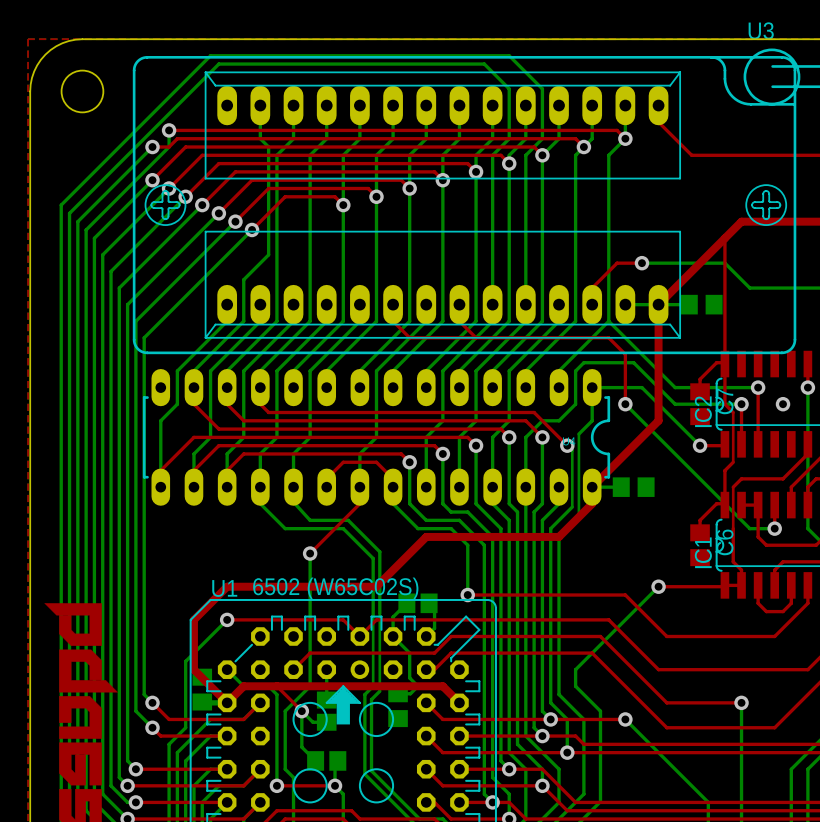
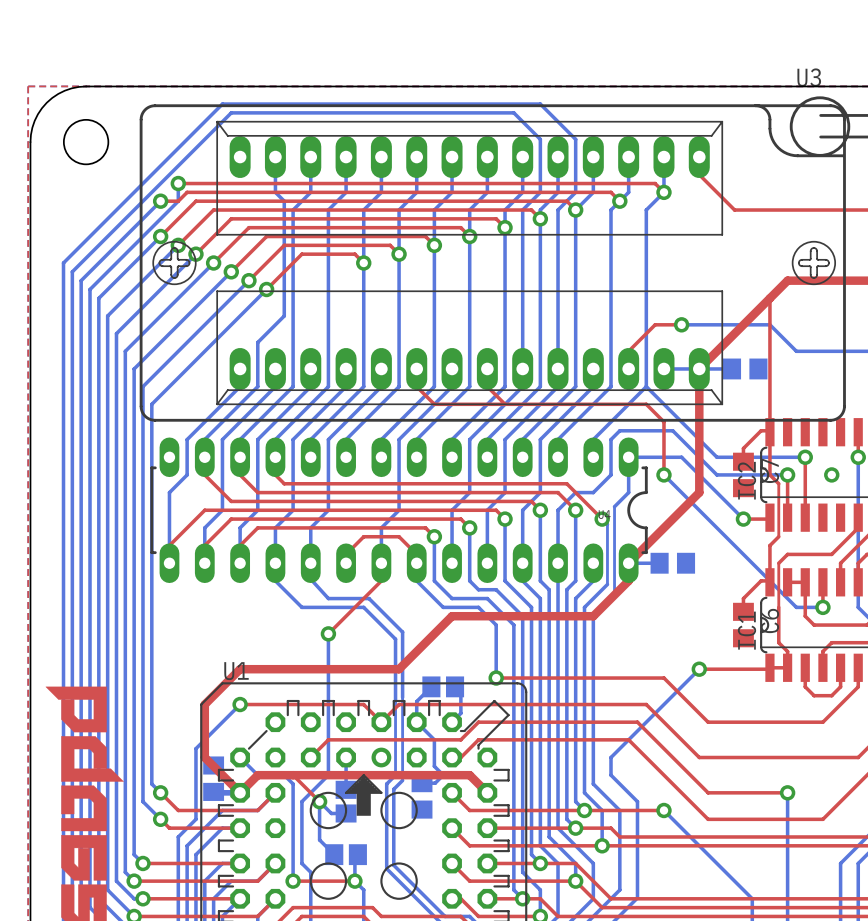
text: 6502 (W65C02S) (335, 588) -> none

